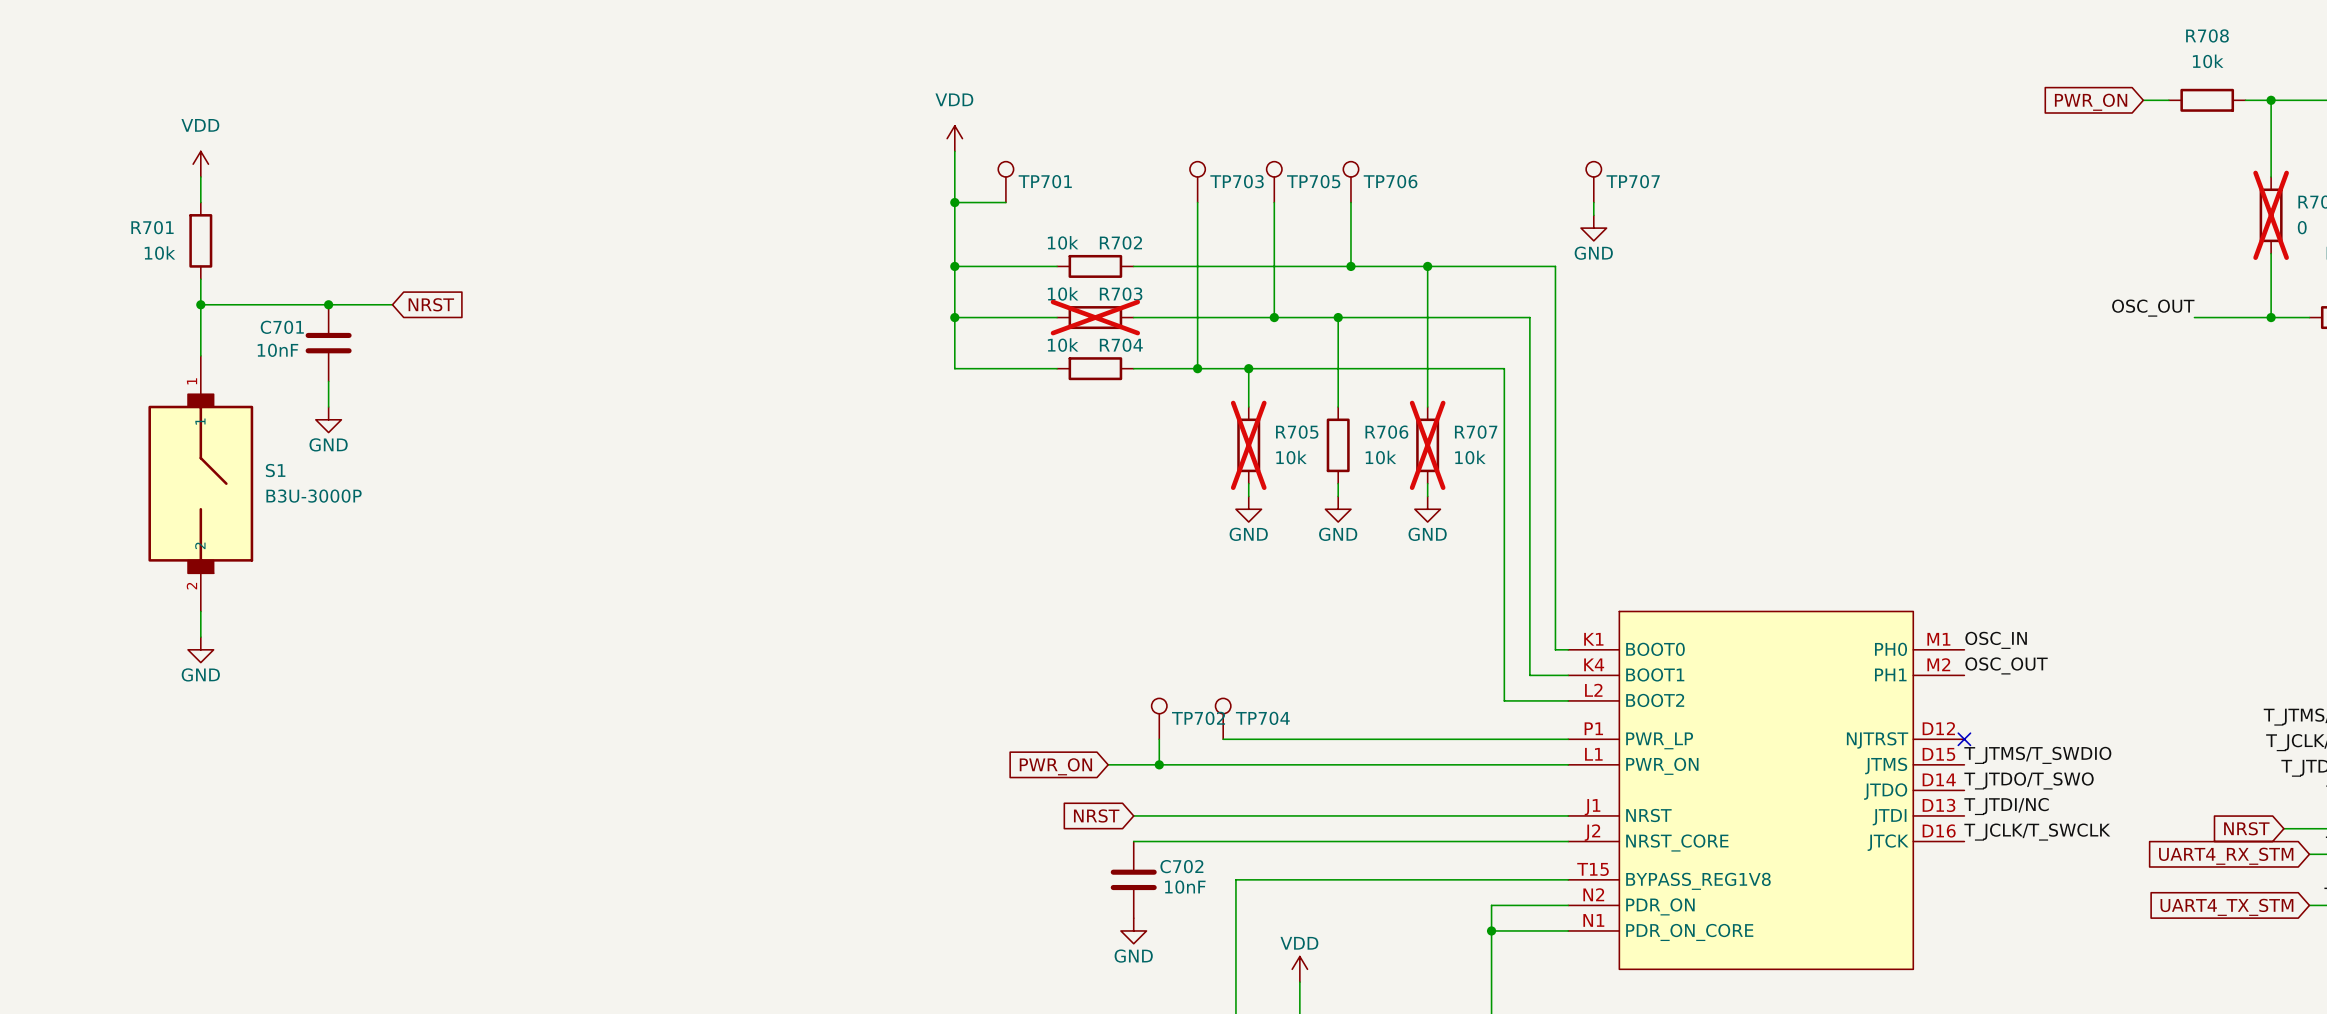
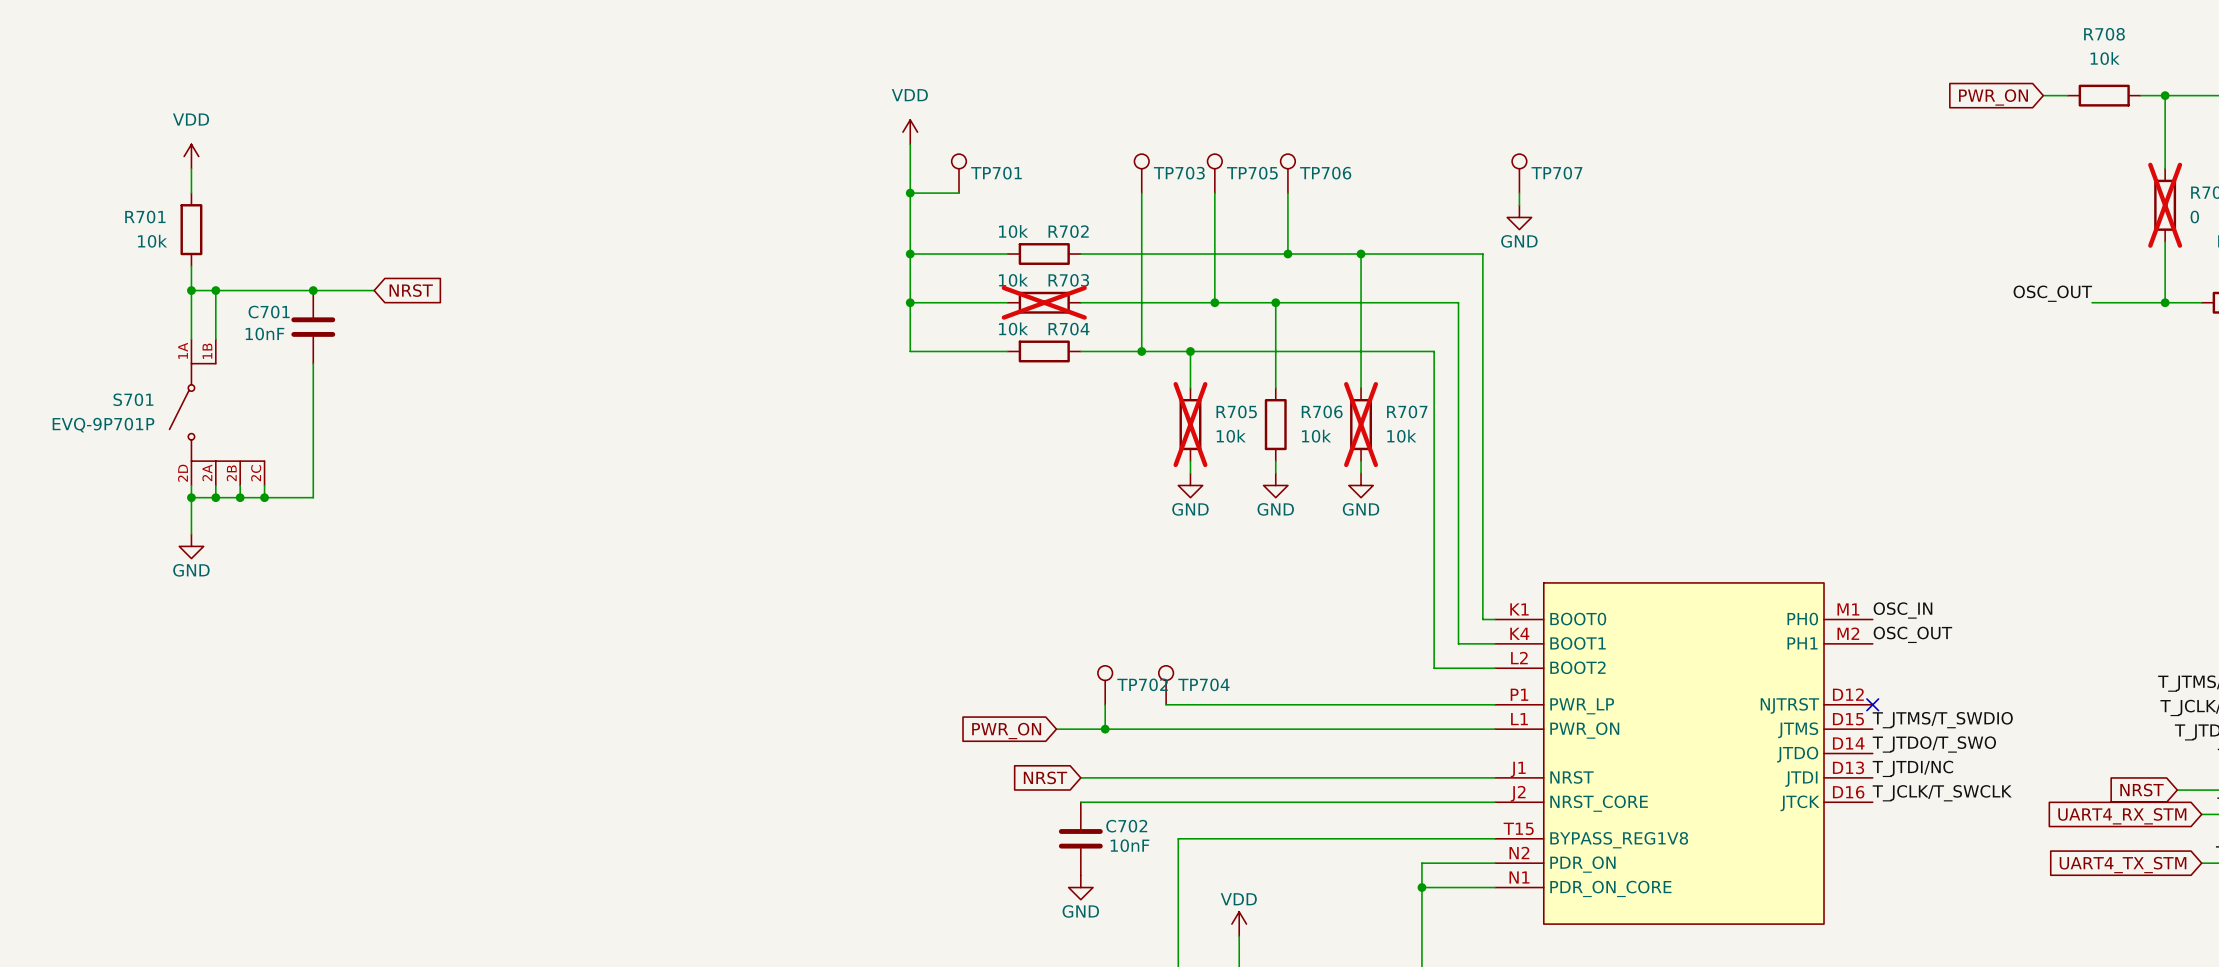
wire: none -> (215, 290) (215, 339)
junction: none -> (215, 290)
wire: none -> (313, 388) (313, 497) (191, 497)
power symbol: GND (328, 419) -> none
S701: none -> EVQ-9P701P (216, 412)
S1: B3U-3000P (200, 483) -> none
wire: none -> (264, 485) (264, 497)
junction: none -> (191, 497)
junction: none -> (215, 497)
junction: none -> (240, 497)
junction: none -> (264, 497)
wire: (200, 611) (200, 637) -> none
power symbol position: GND (200, 649) -> GND (191, 546)

